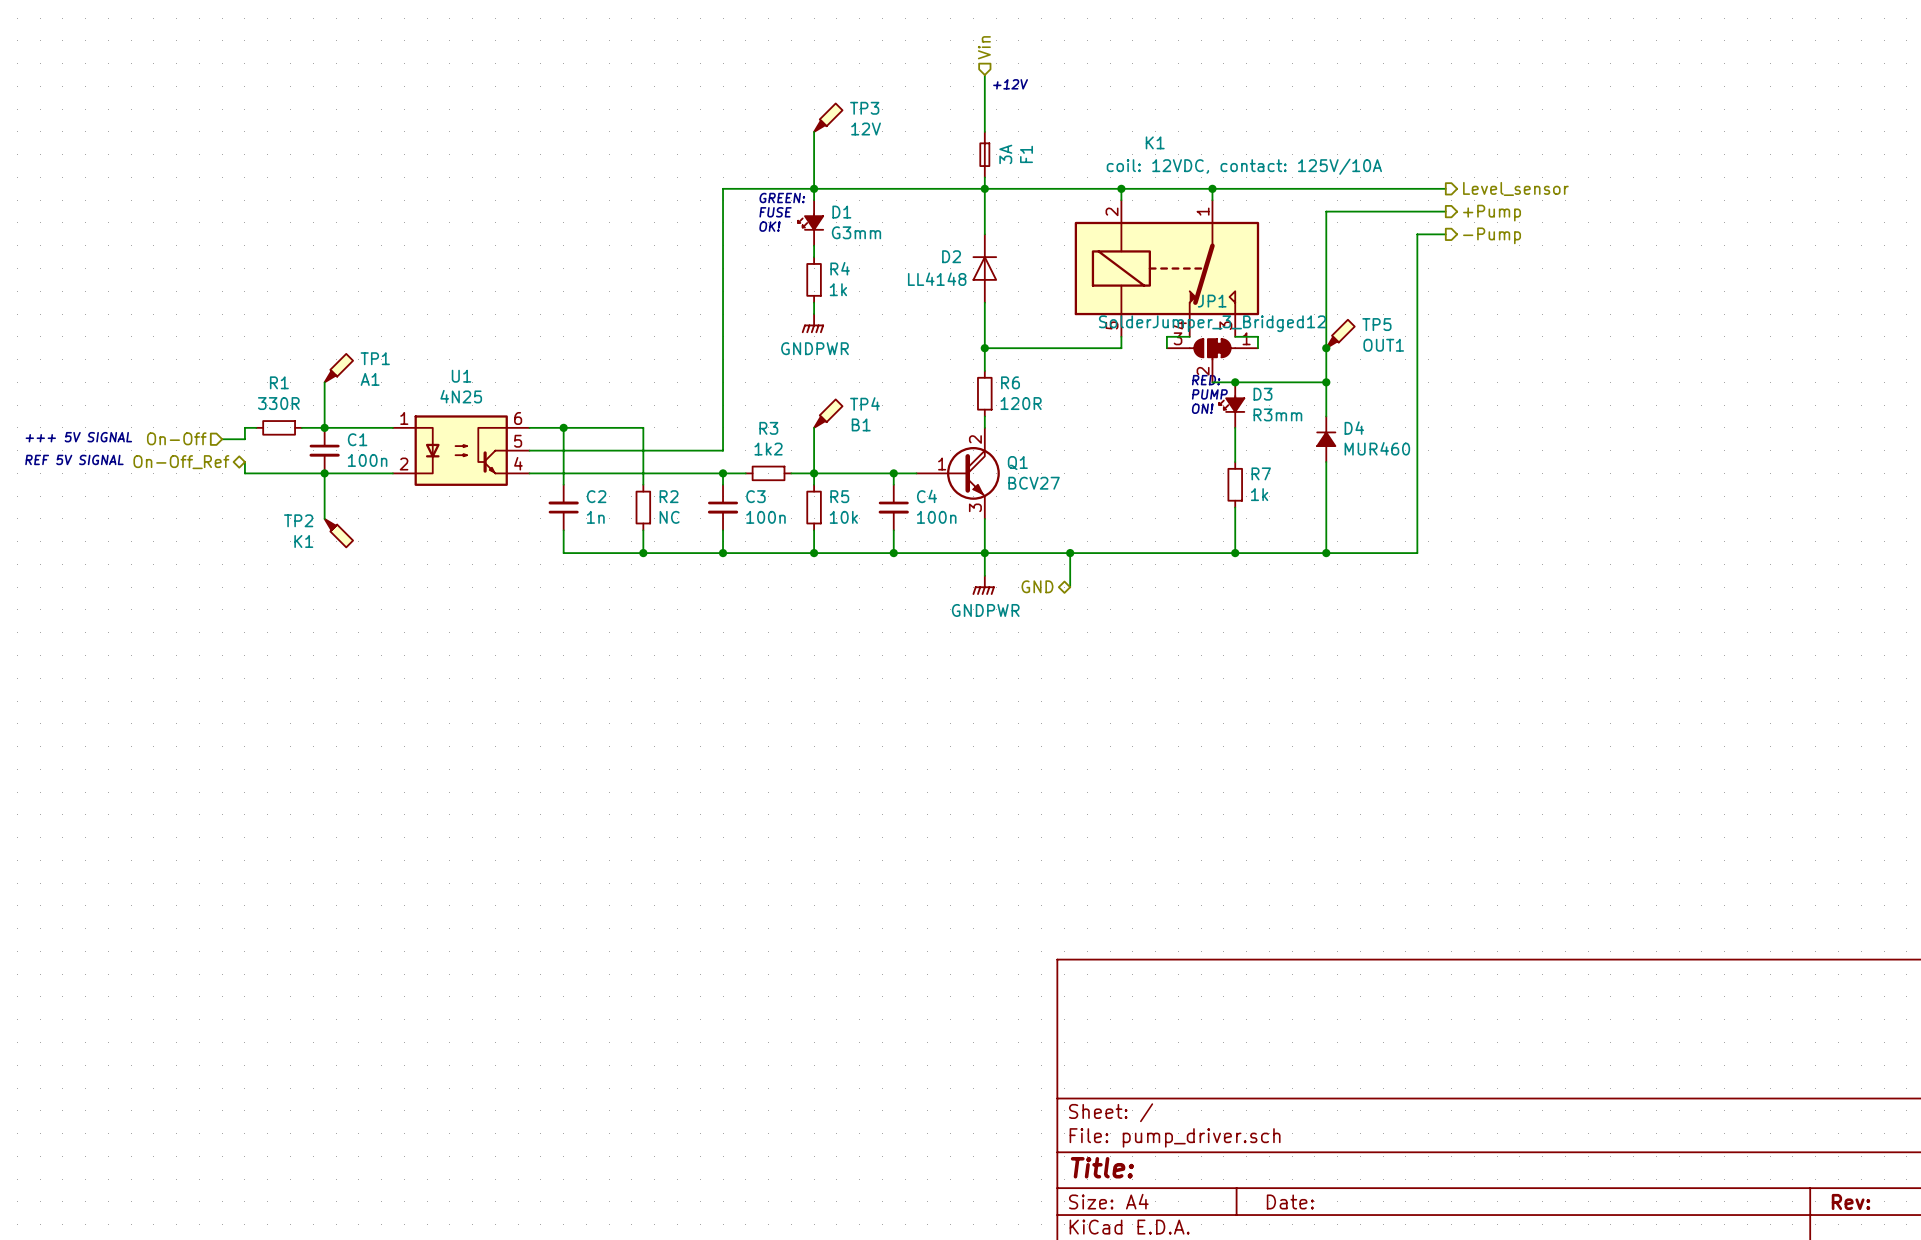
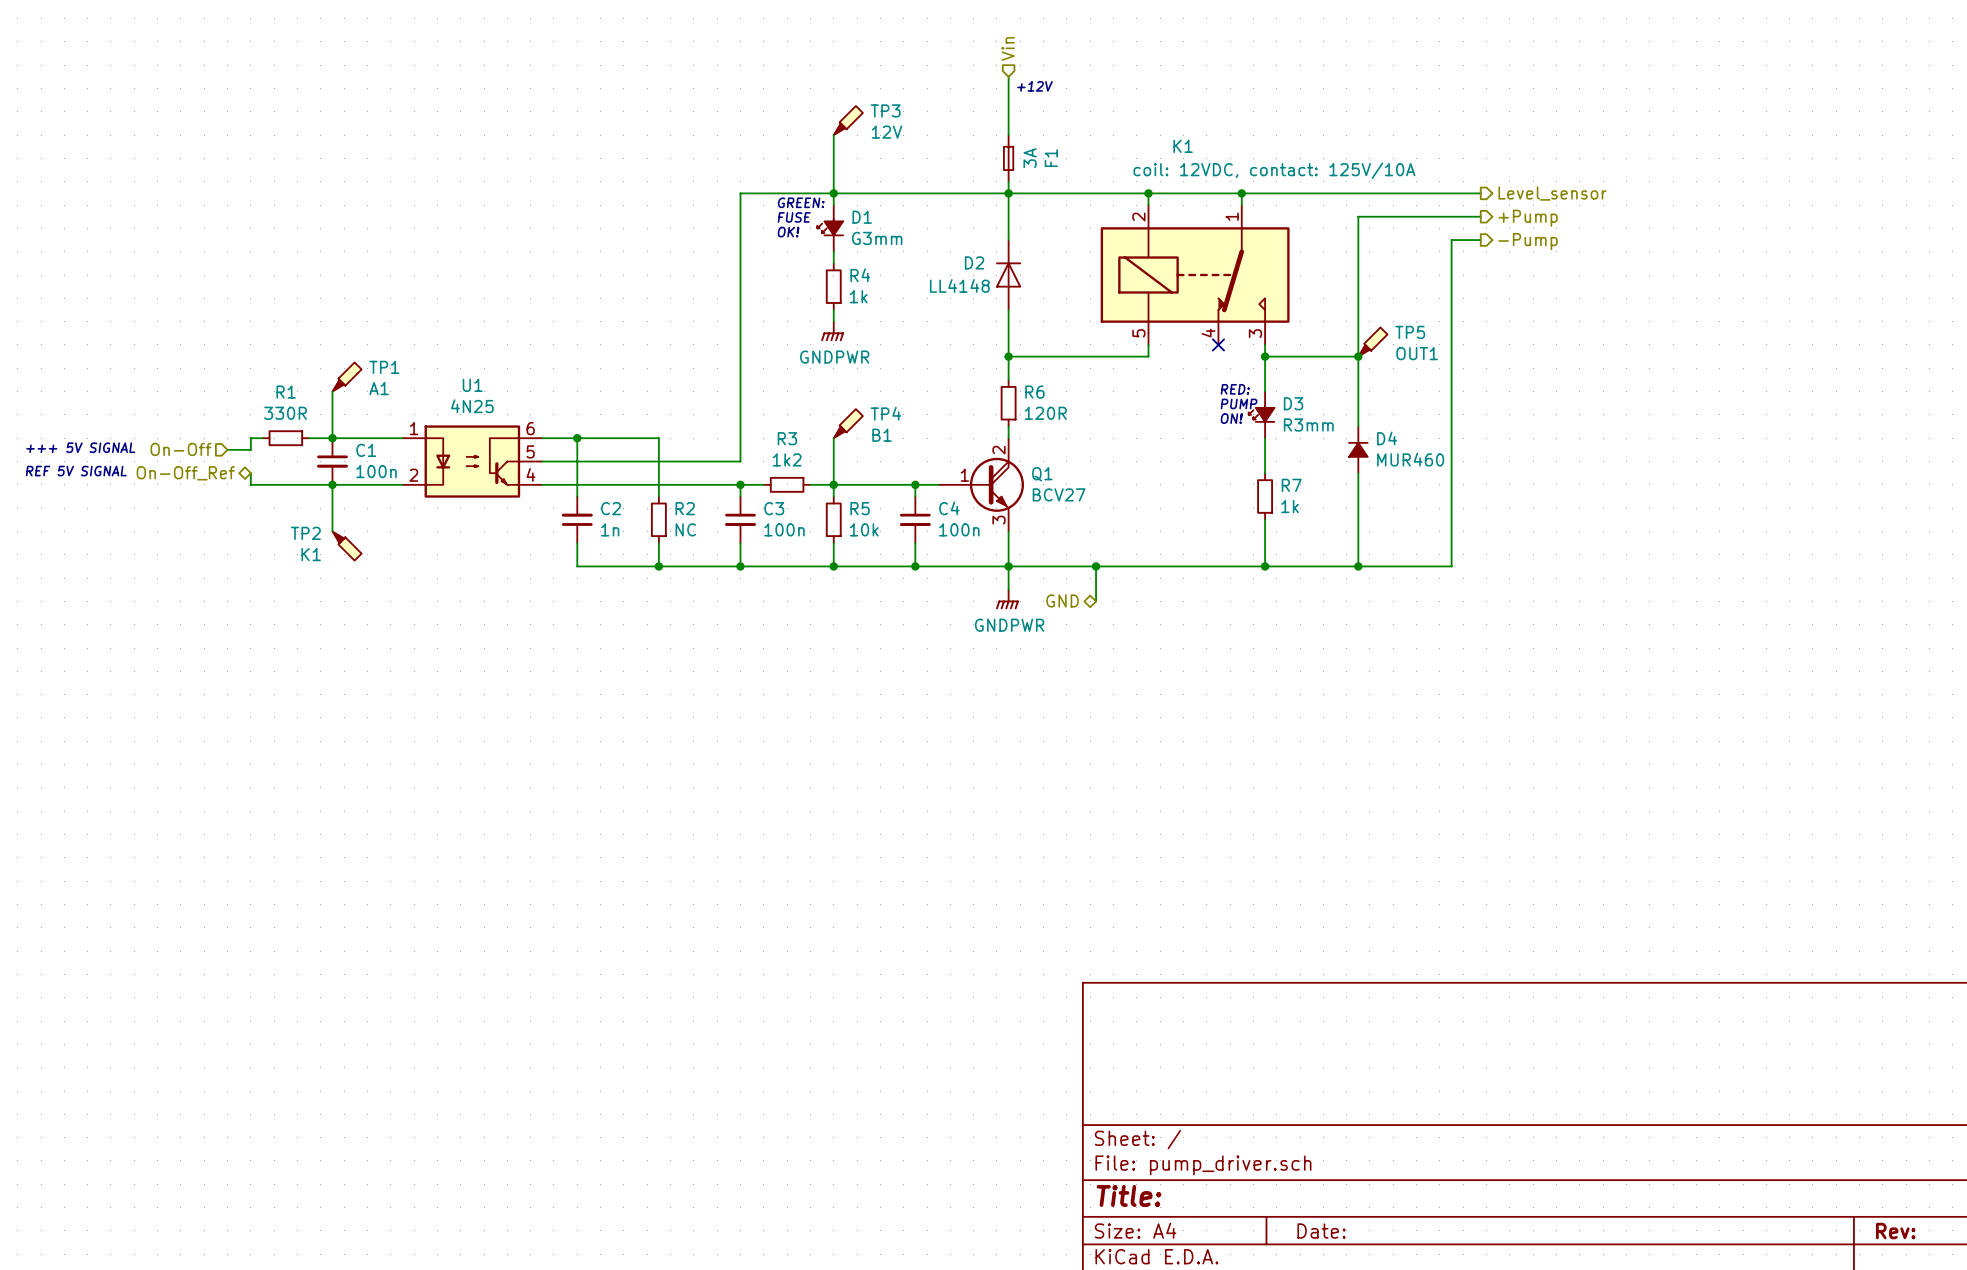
wire: (1189, 336) (1166, 336) (1166, 348) -> none
no-connect mark: none -> (1218, 344)
wire: (1235, 336) (1257, 336) (1257, 348) -> (1265, 344) (1265, 391)
wire: none -> (1265, 356) (1358, 356)
JP1: SolderJumper_3_Bridged12 (1212, 360) -> none
wire: (1212, 382) (1326, 382) -> none
junction position: (1235, 382) -> (1265, 356)
junction: (1326, 382) -> none

